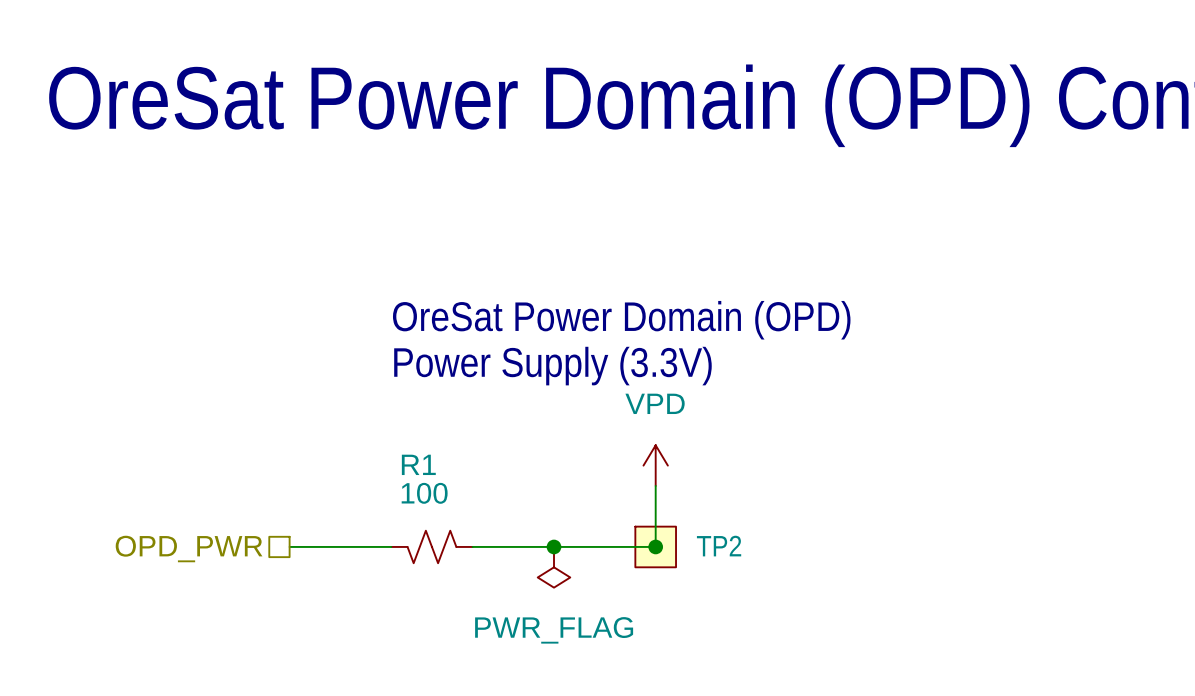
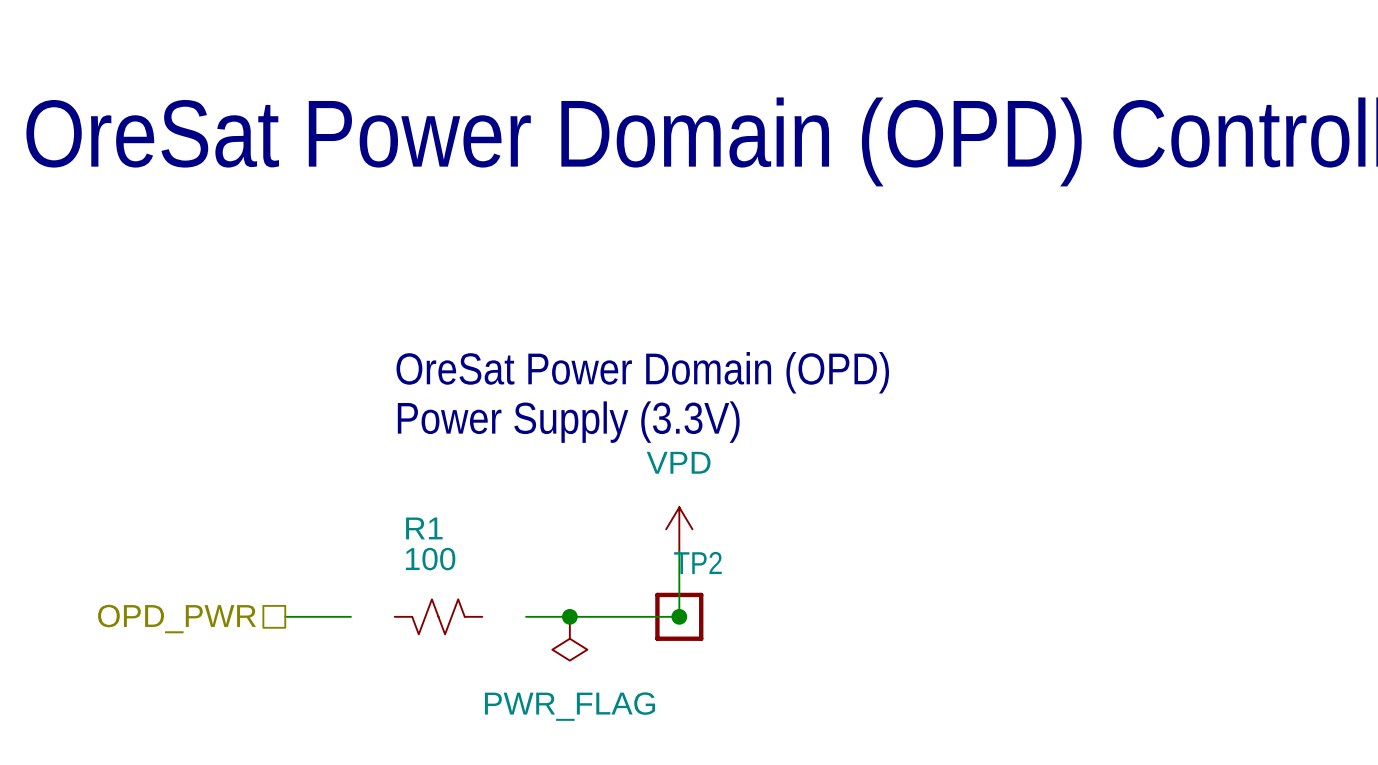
TP2 symbol: [635, 526, 677, 568] -> [655, 592, 704, 641]
wire: (350, 546) (391, 546) -> none
wire: (472, 546) (513, 546) -> none
TP2 name position: TP2 (719, 546) -> TP2 (697, 562)

